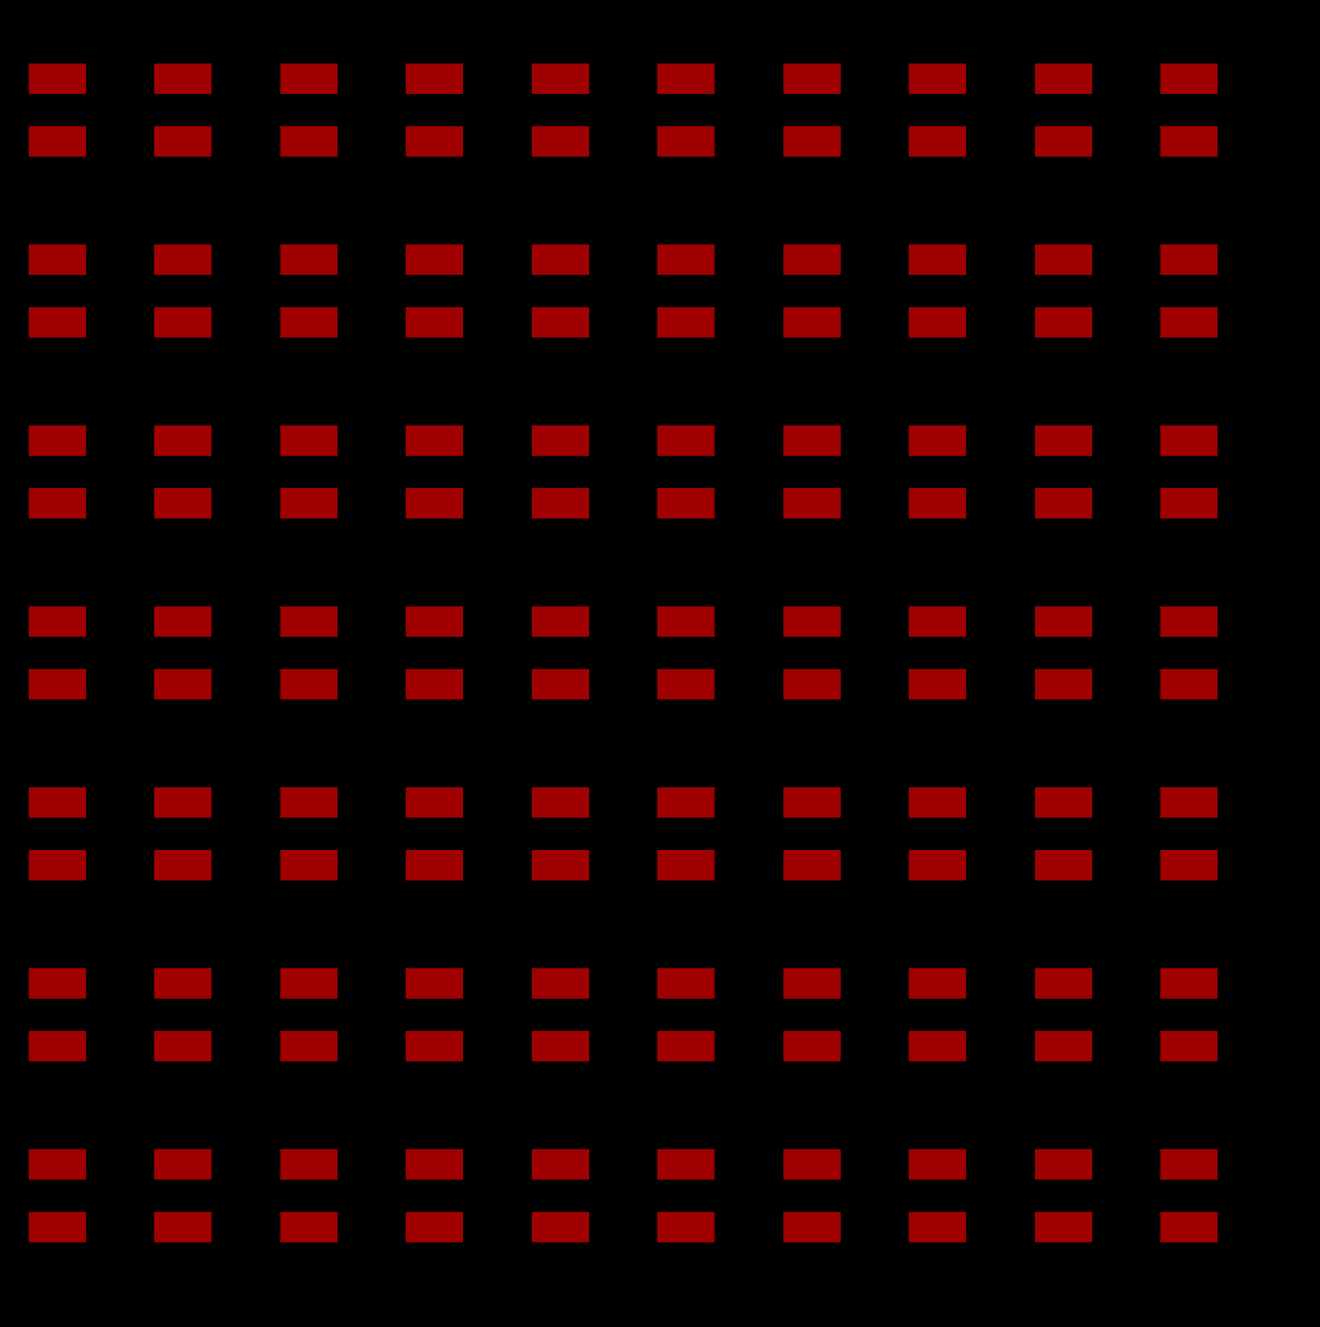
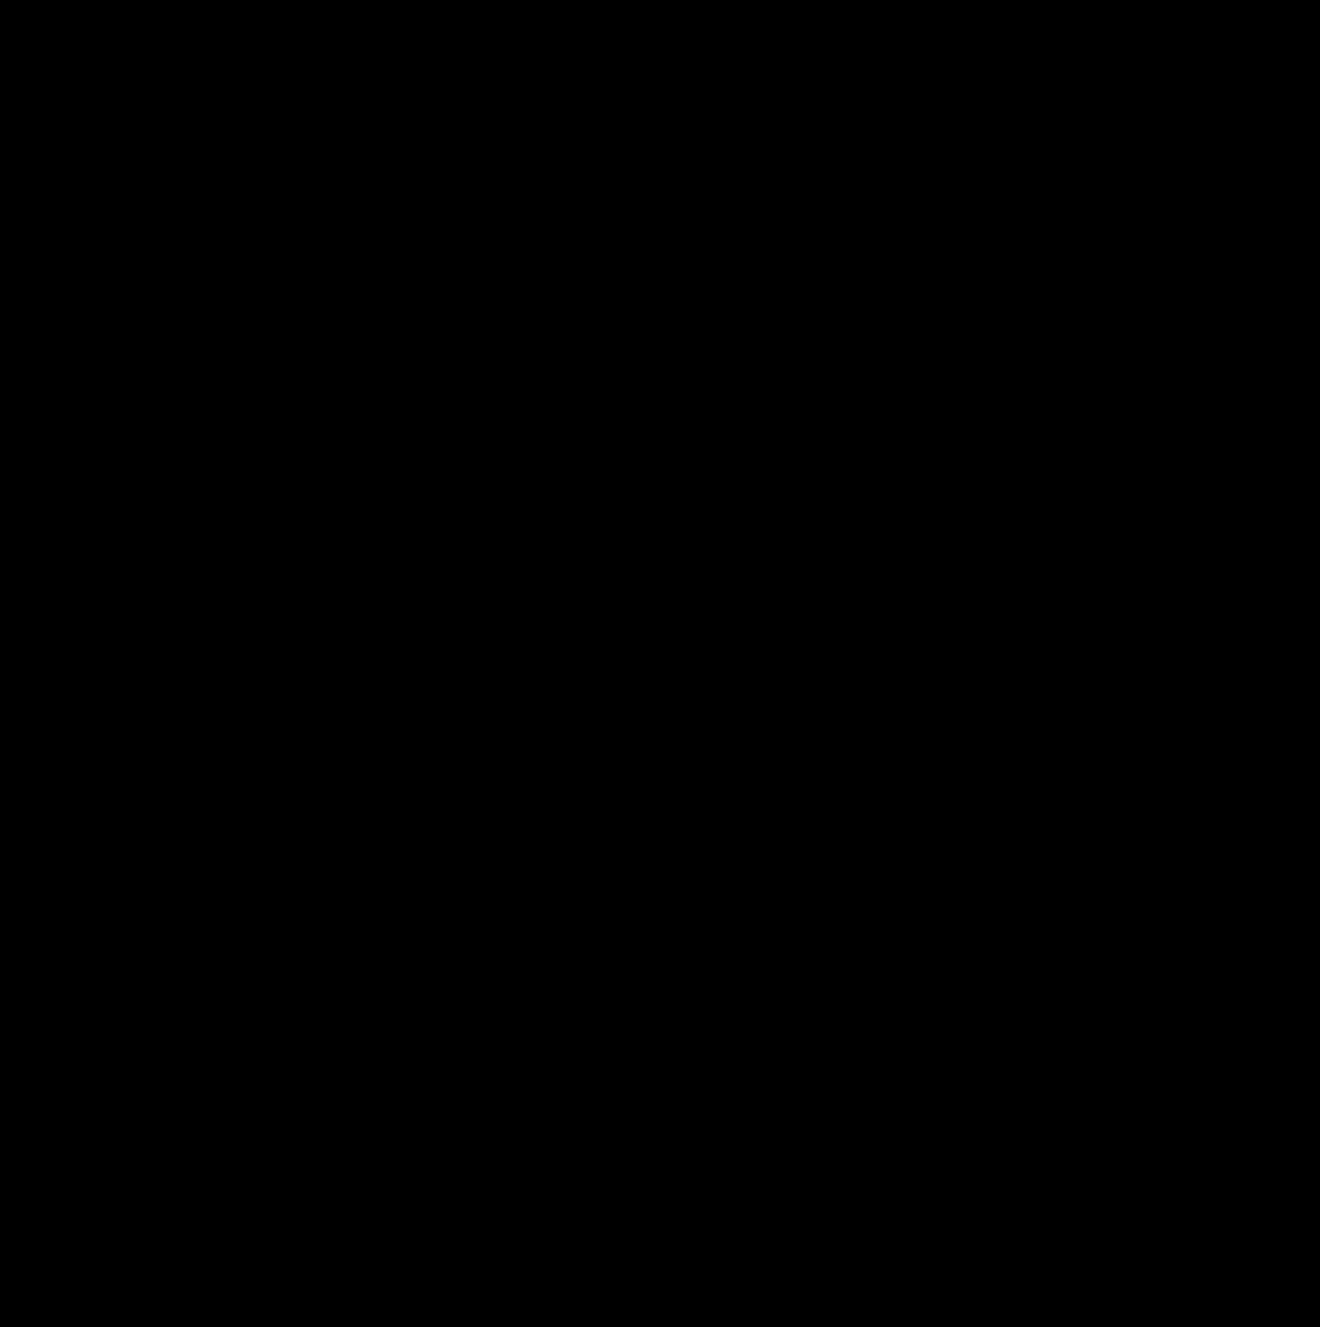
part: (120, 110) -> none
part: (371, 110) -> none
part: (623, 110) -> none
part: (874, 110) -> none
part: (1126, 110) -> none
part: (120, 291) -> none
part: (371, 291) -> none
part: (623, 291) -> none
part: (874, 291) -> none
part: (1126, 291) -> none
part: (120, 471) -> none
part: (371, 471) -> none
part: (623, 471) -> none
part: (874, 471) -> none
part: (1126, 471) -> none
part: (120, 652) -> none
part: (371, 652) -> none
part: (623, 652) -> none
part: (874, 652) -> none
part: (1126, 652) -> none
part: (120, 833) -> none
part: (371, 833) -> none
part: (623, 833) -> none
part: (874, 833) -> none
part: (1126, 833) -> none
part: (120, 1014) -> none
part: (371, 1014) -> none
part: (623, 1014) -> none
part: (874, 1014) -> none
part: (1126, 1014) -> none
part: (120, 1195) -> none
part: (371, 1195) -> none
part: (623, 1195) -> none
part: (874, 1195) -> none
part: (1126, 1195) -> none

